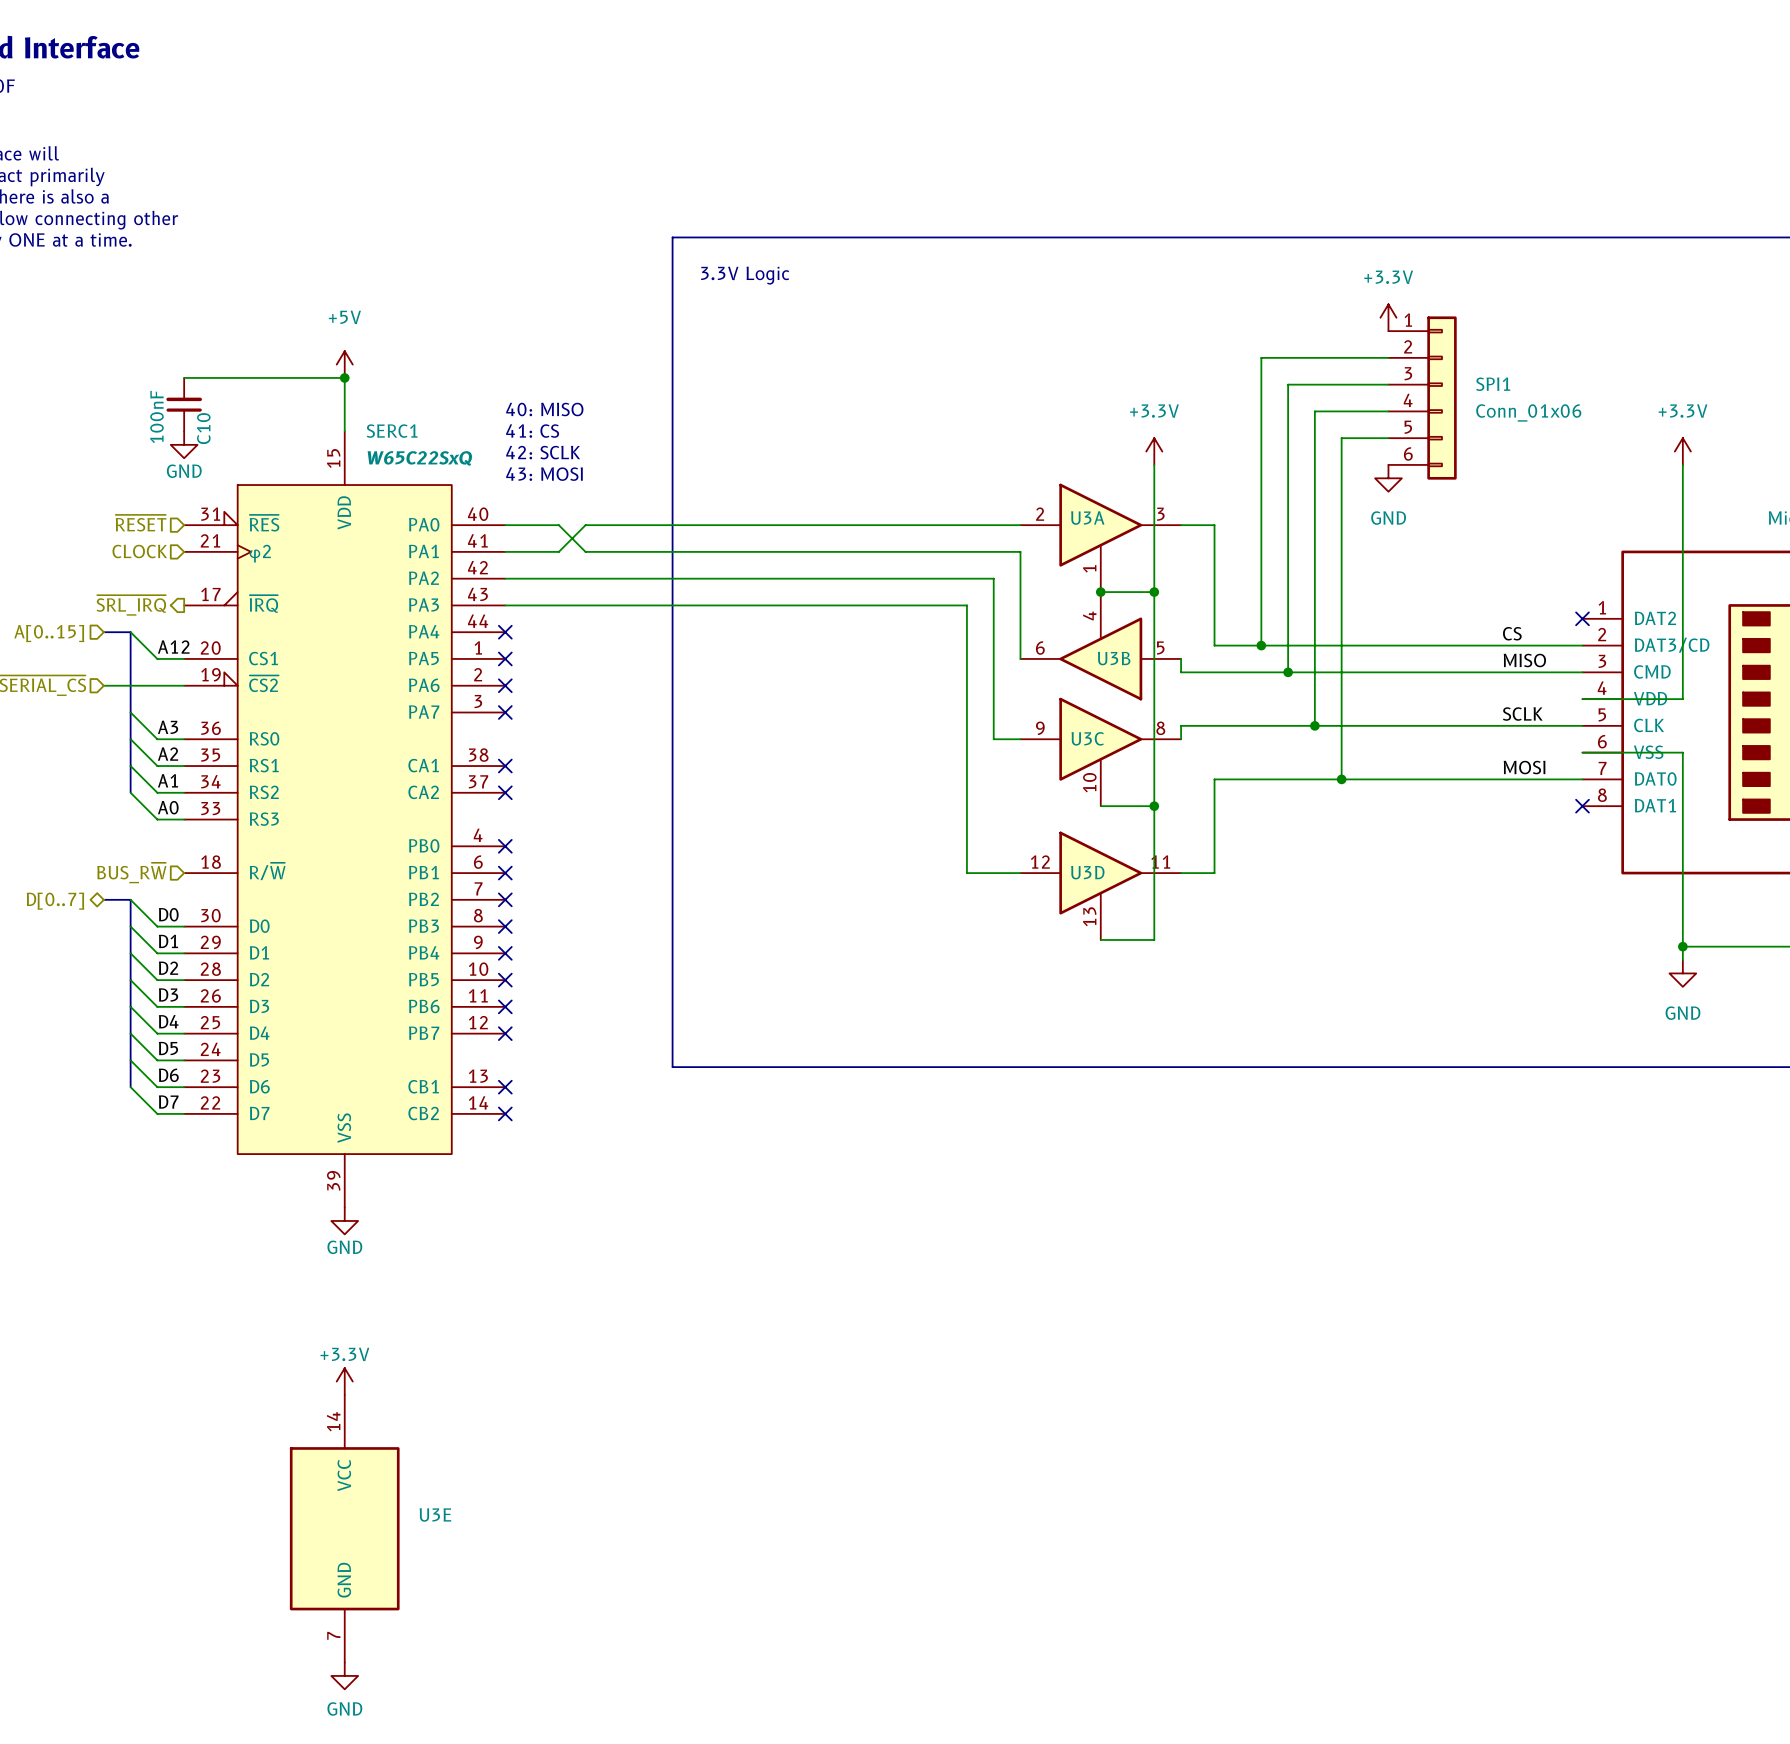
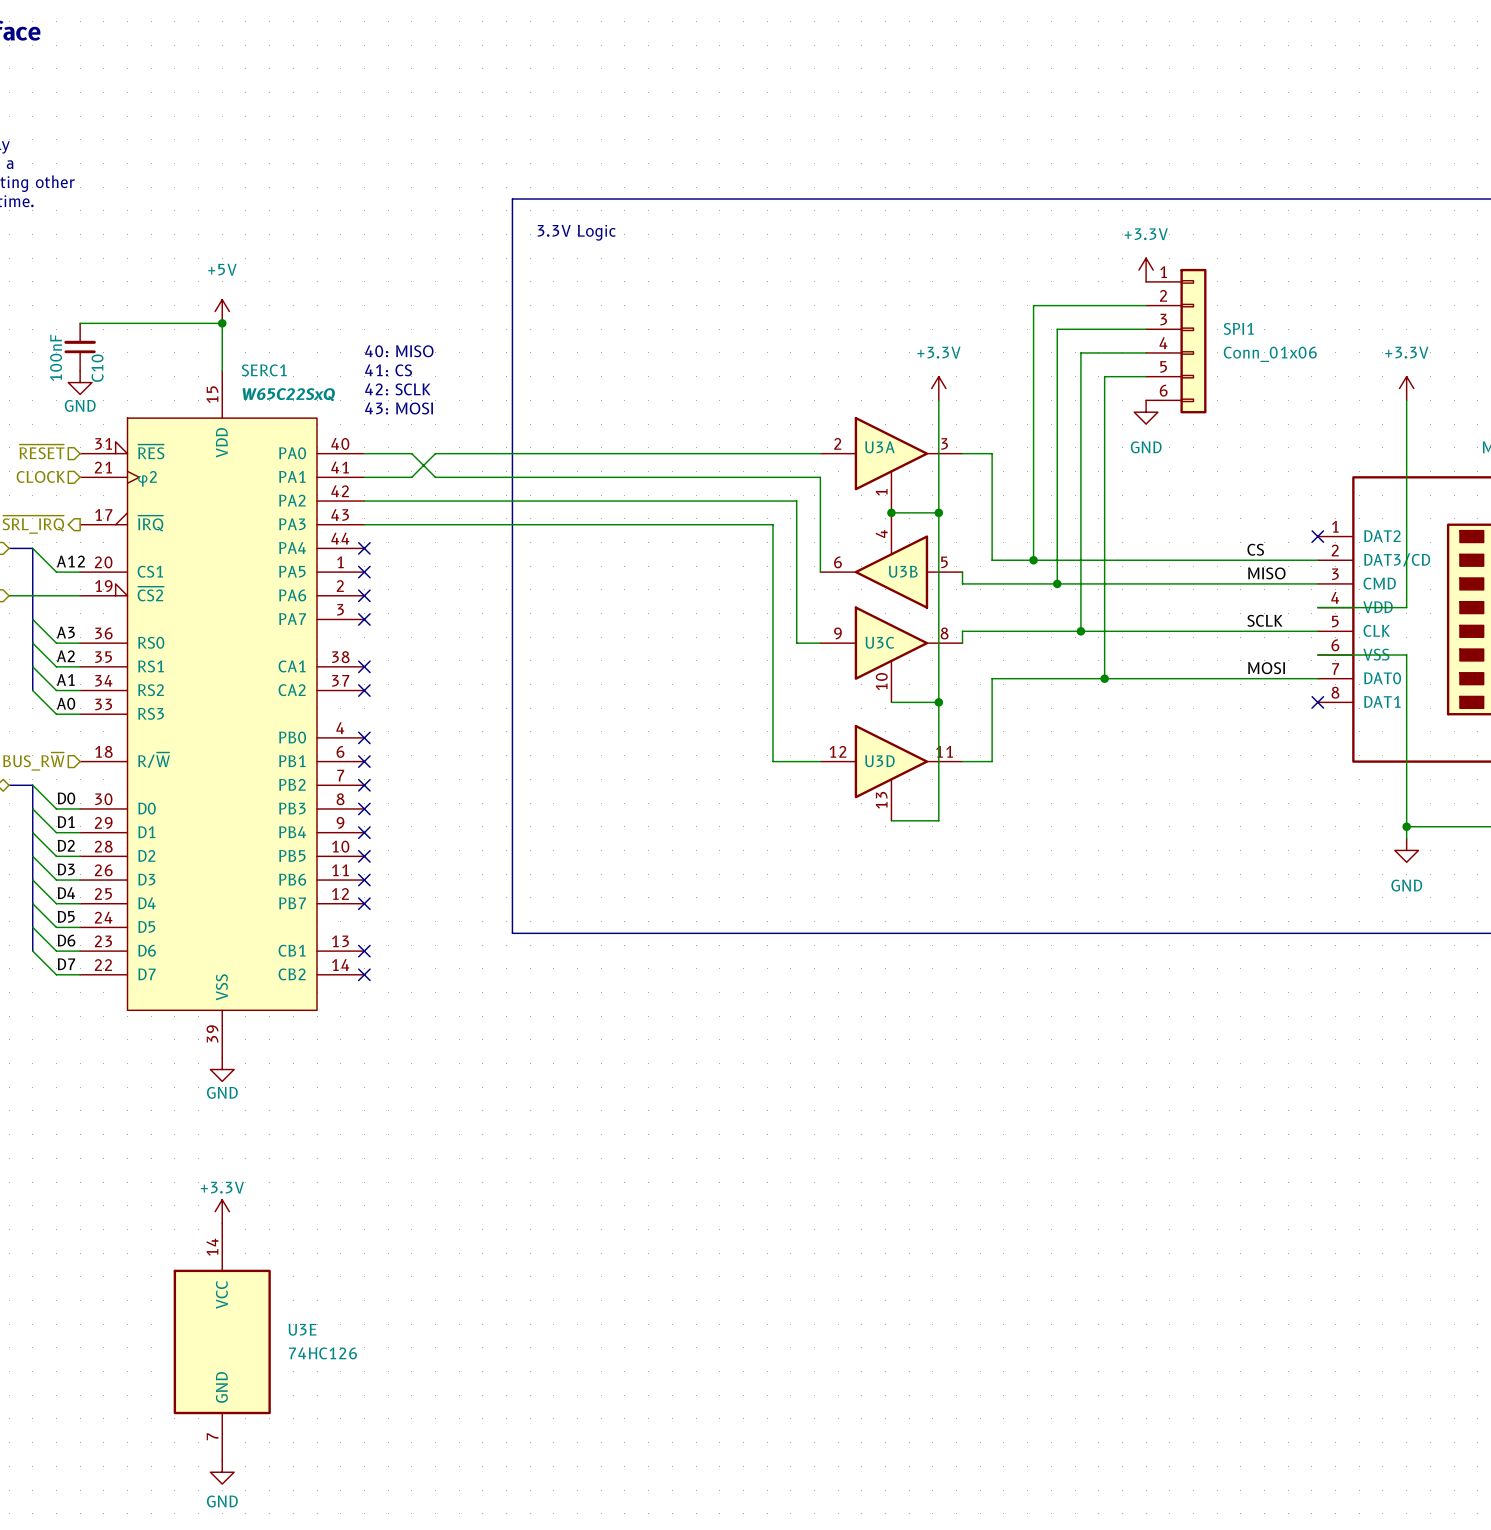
U3E value: none -> 74HC126 (322, 1353)

